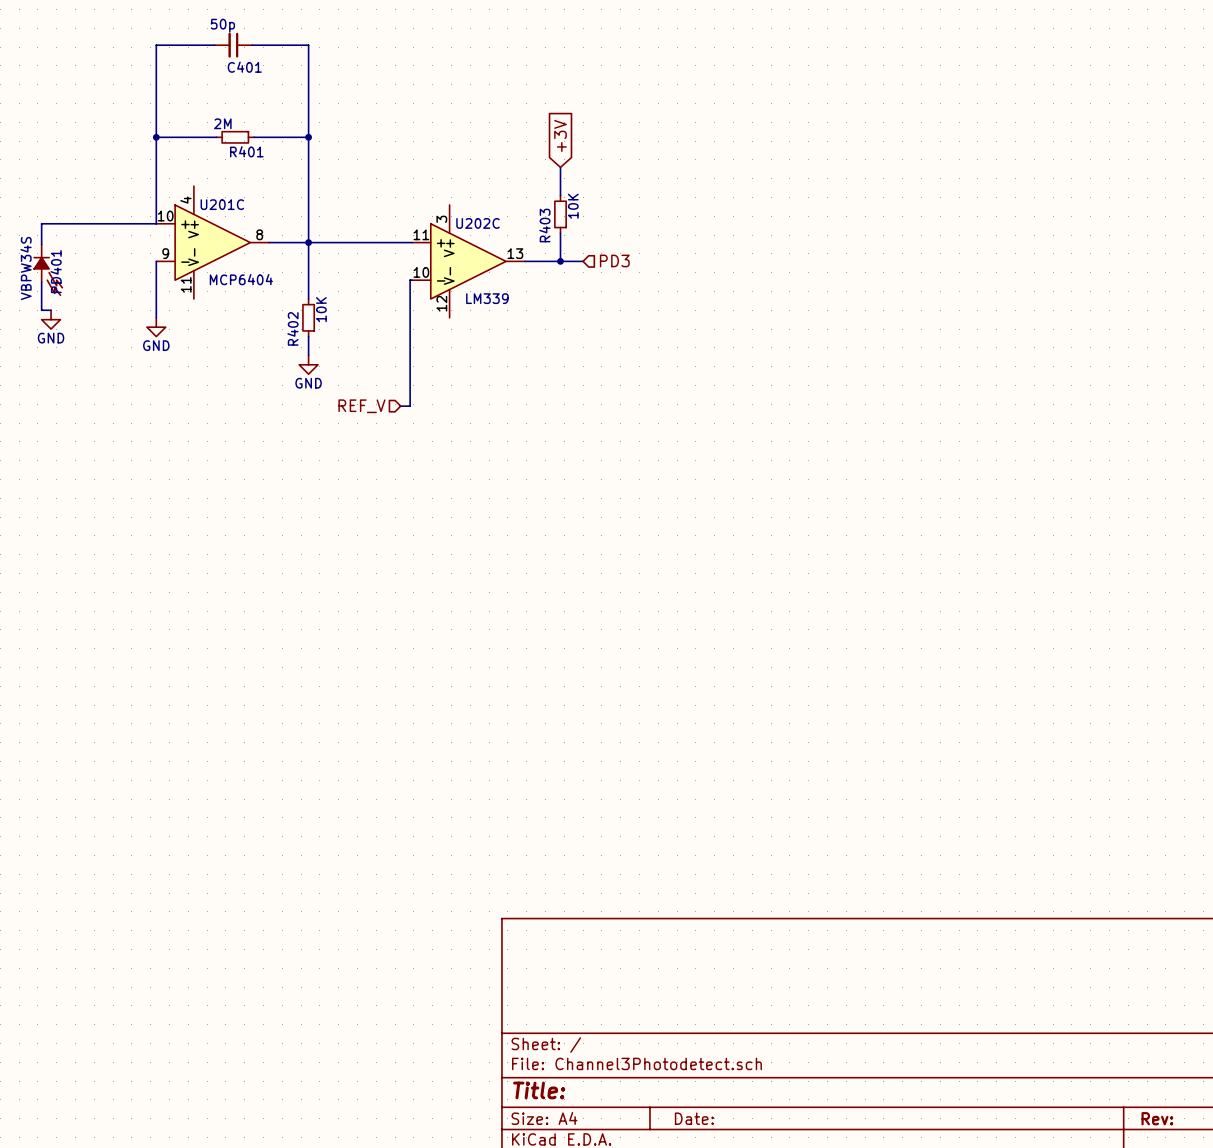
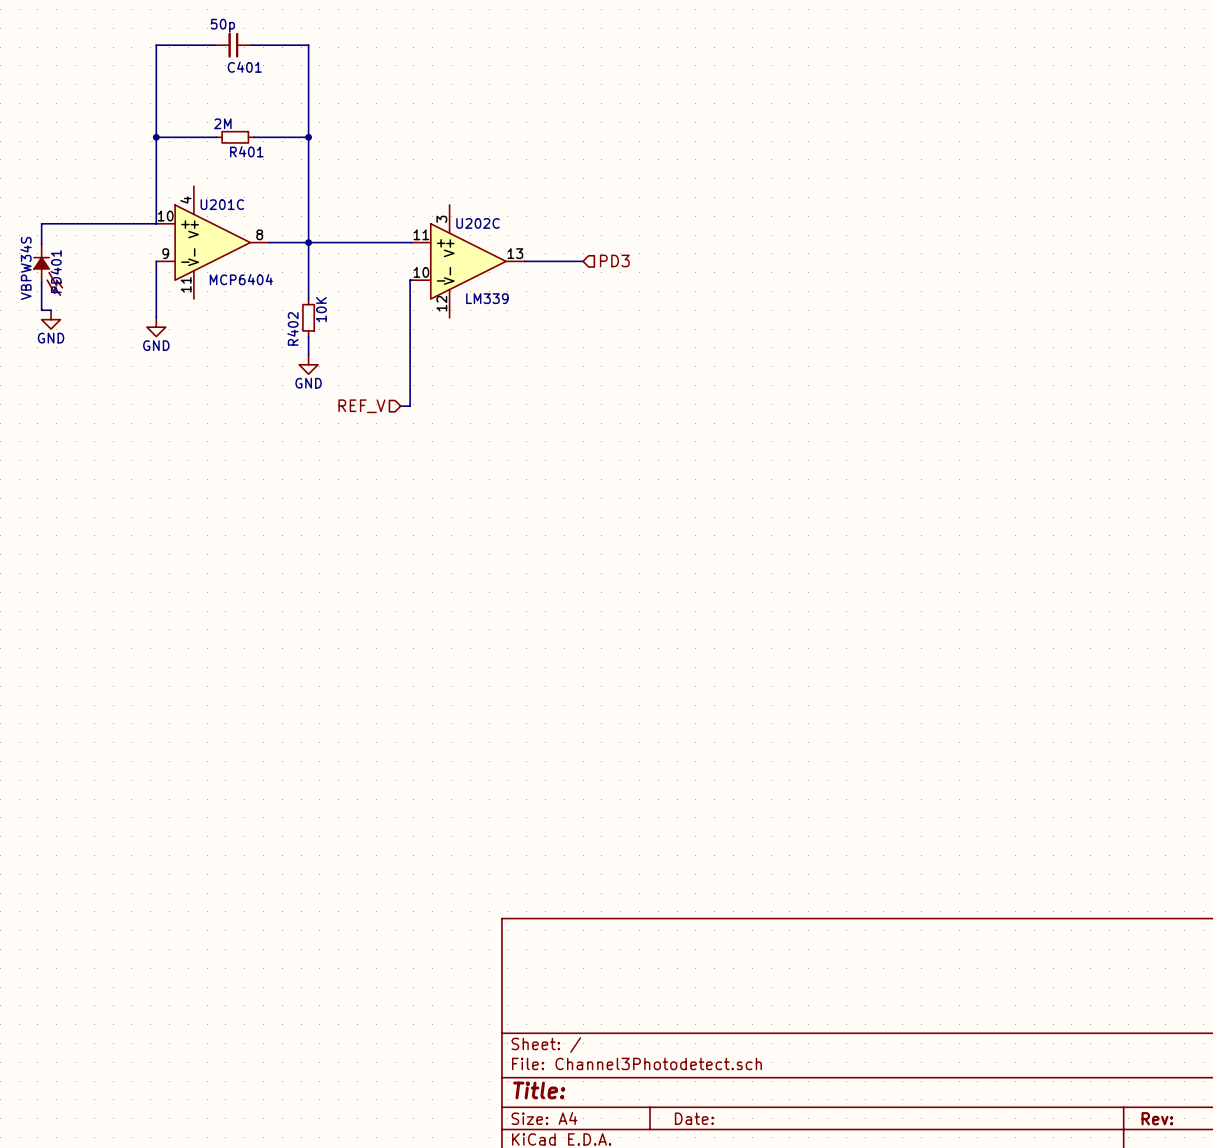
global label: +3V (560, 135) -> none
wire: (560, 167) (560, 195) -> none
R403: 10K (560, 214) -> none
wire: (560, 233) (560, 261) -> none
junction: (560, 261) -> none

